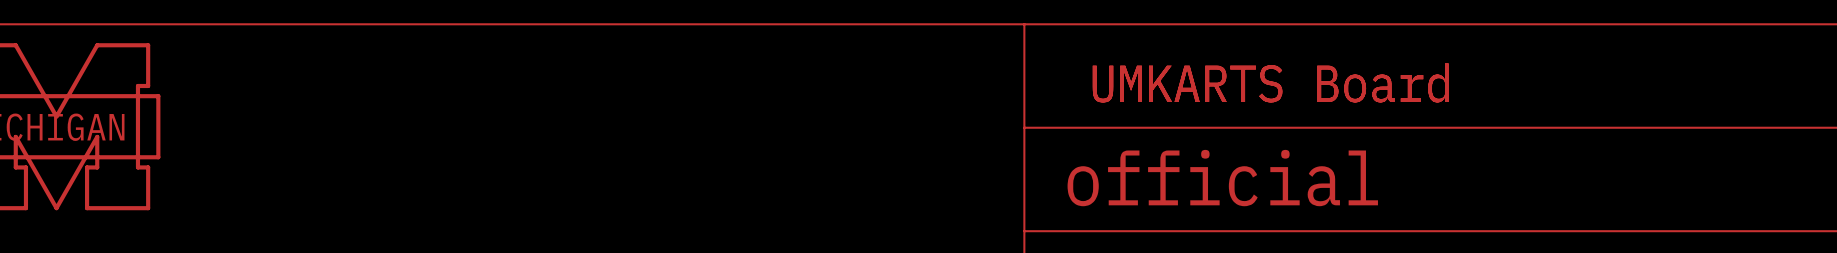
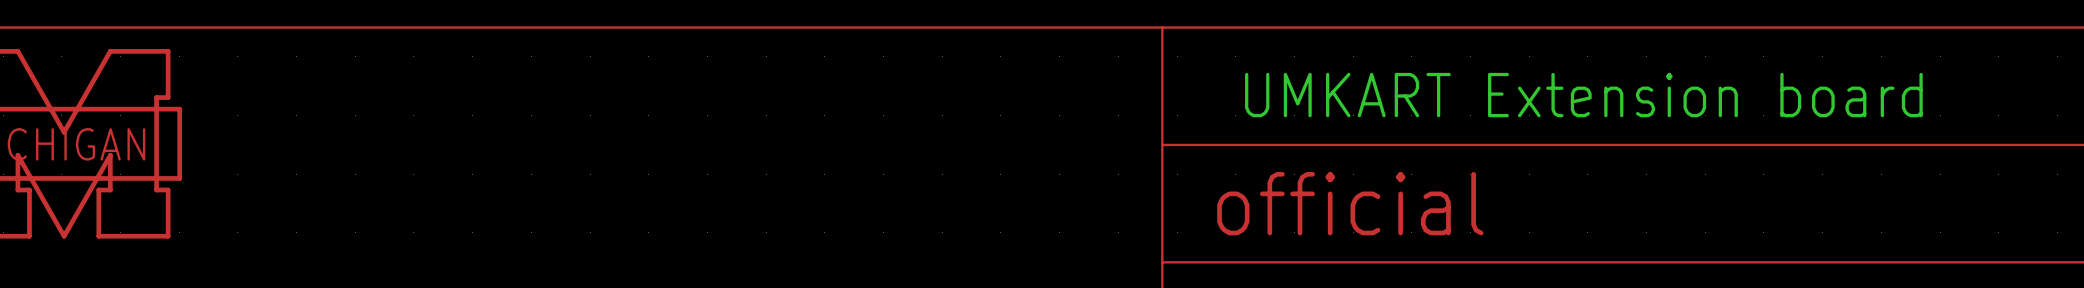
text: UMKARTS Board (1270, 82) -> UMKART Extension board (1583, 95)

